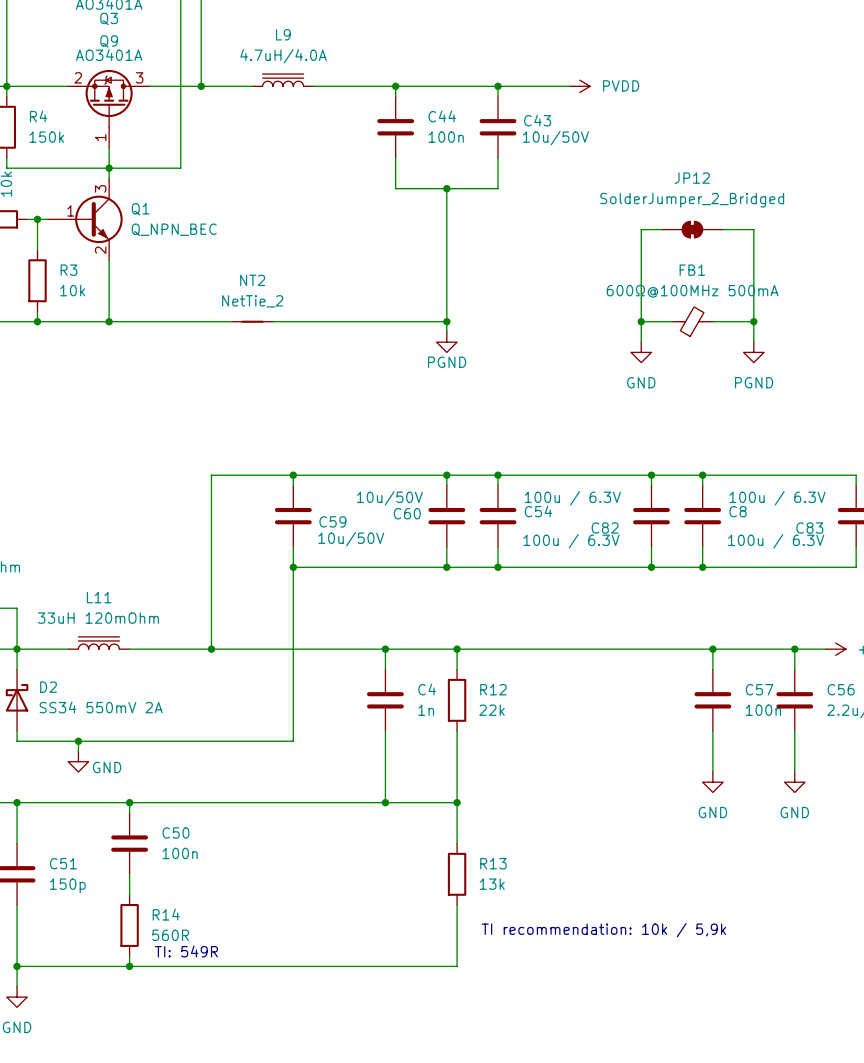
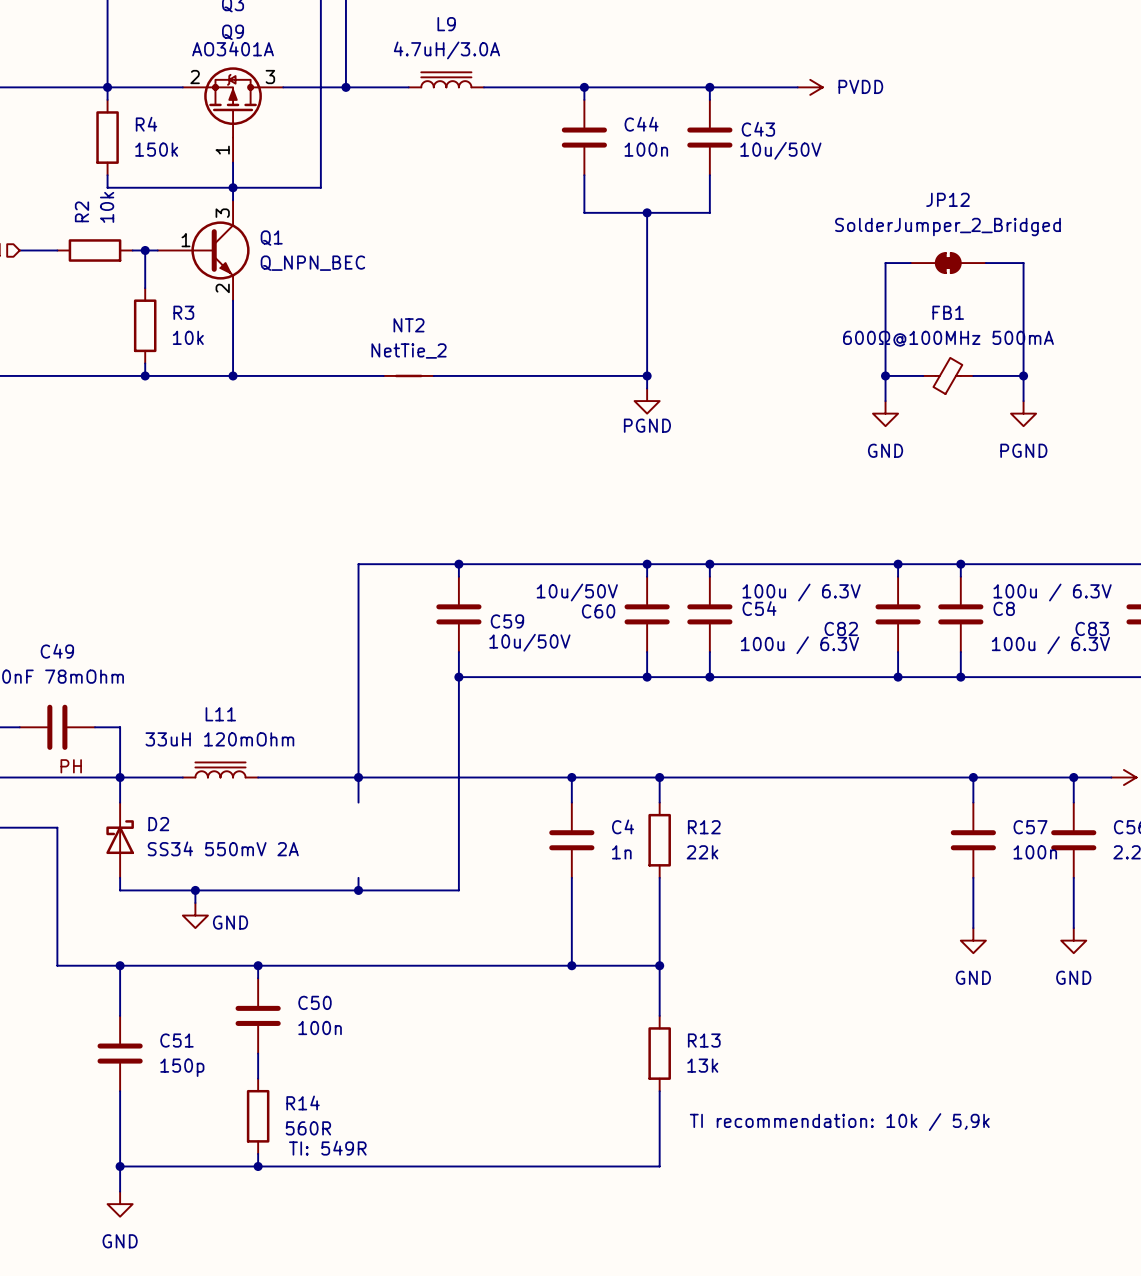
L9 value: 4.7uH/4.0A (283, 56) -> 4.7uH/3.0A (446, 50)
wire: none -> (358, 777) (358, 802)
wire: none -> (358, 877) (358, 890)
junction: none -> (358, 890)

